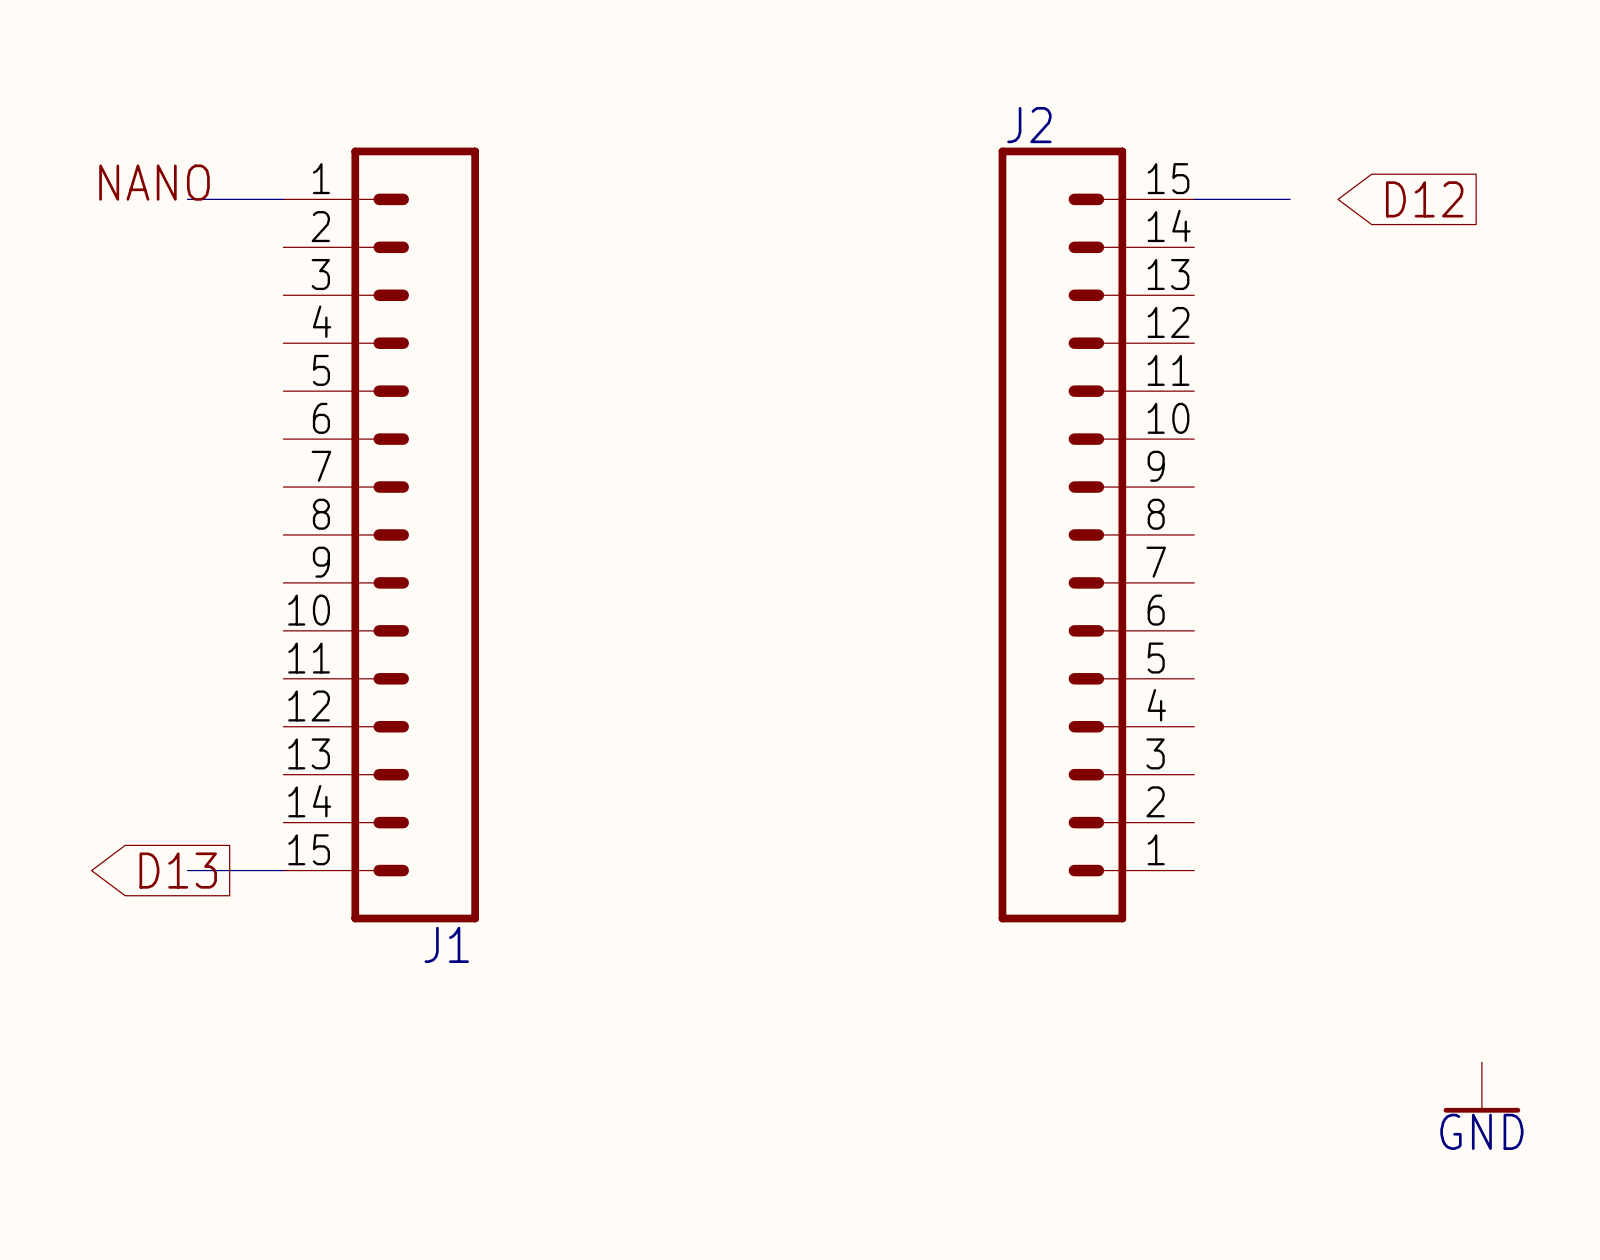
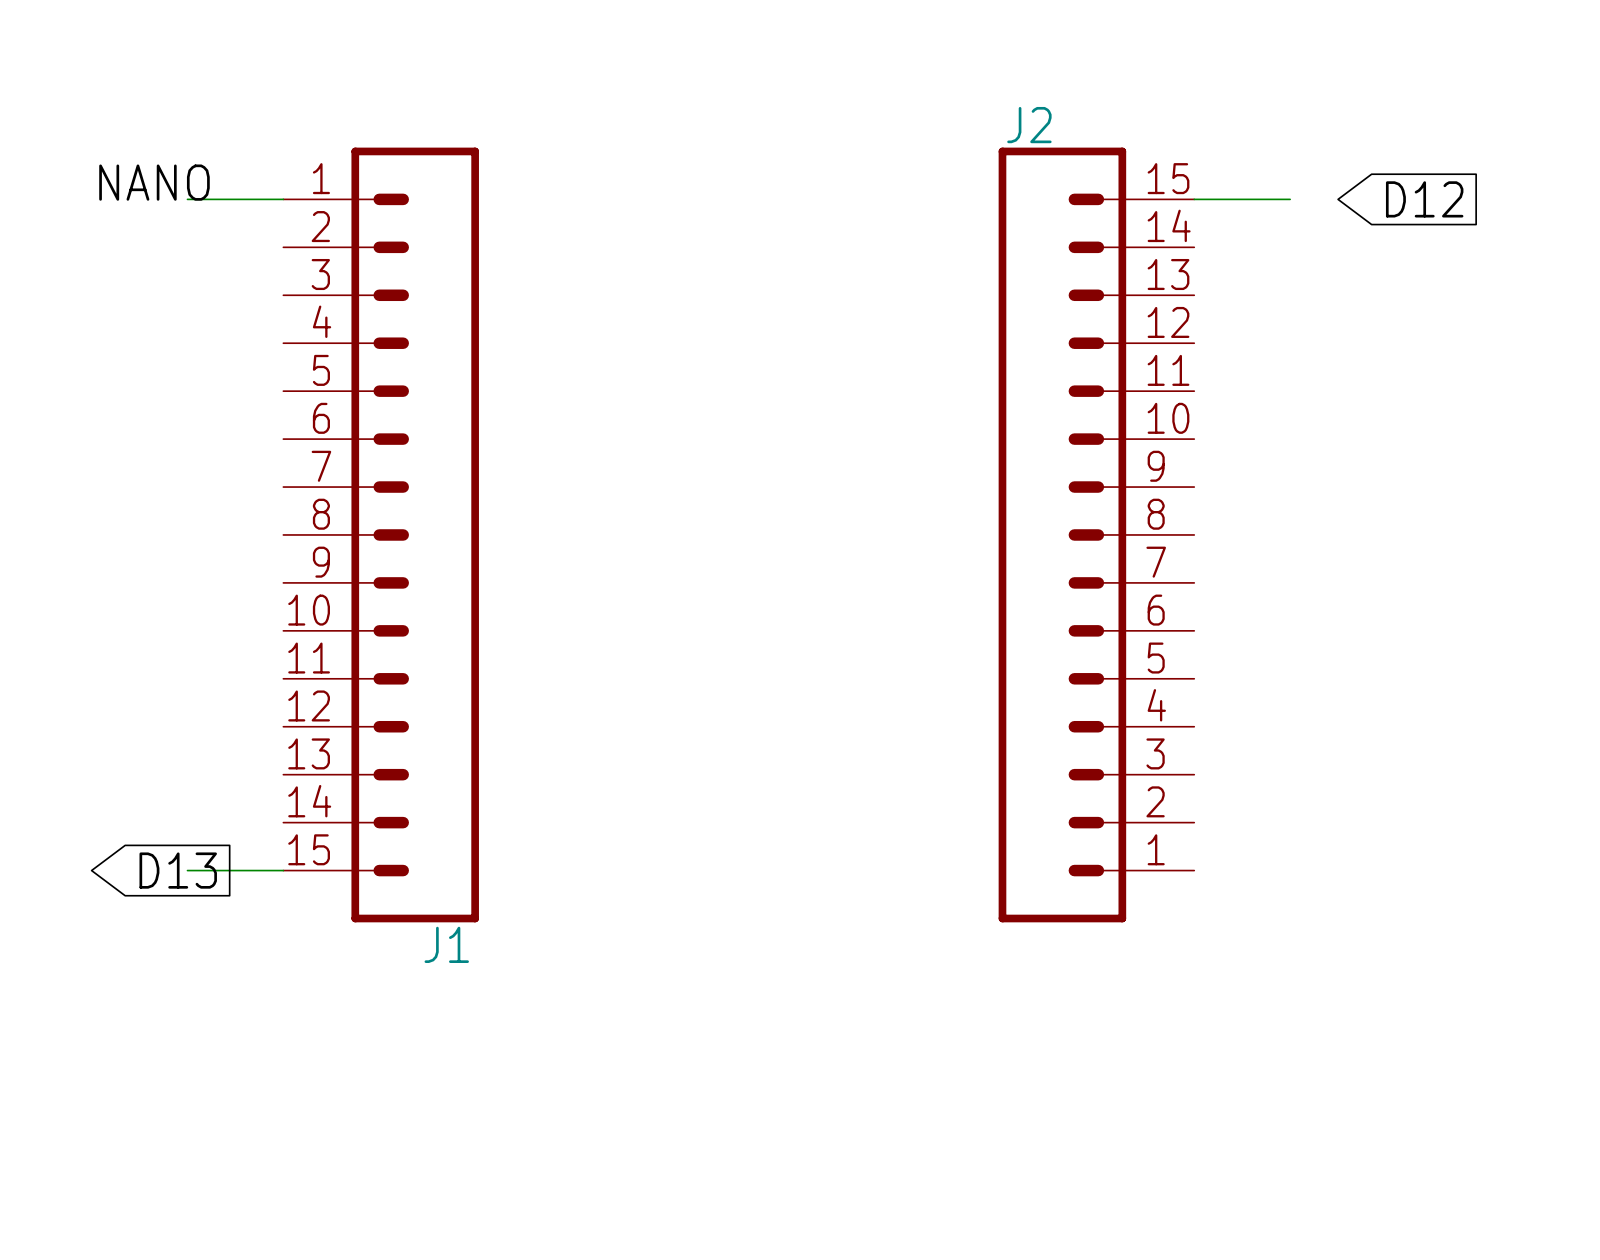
power symbol: GND (1481, 1087) -> none

